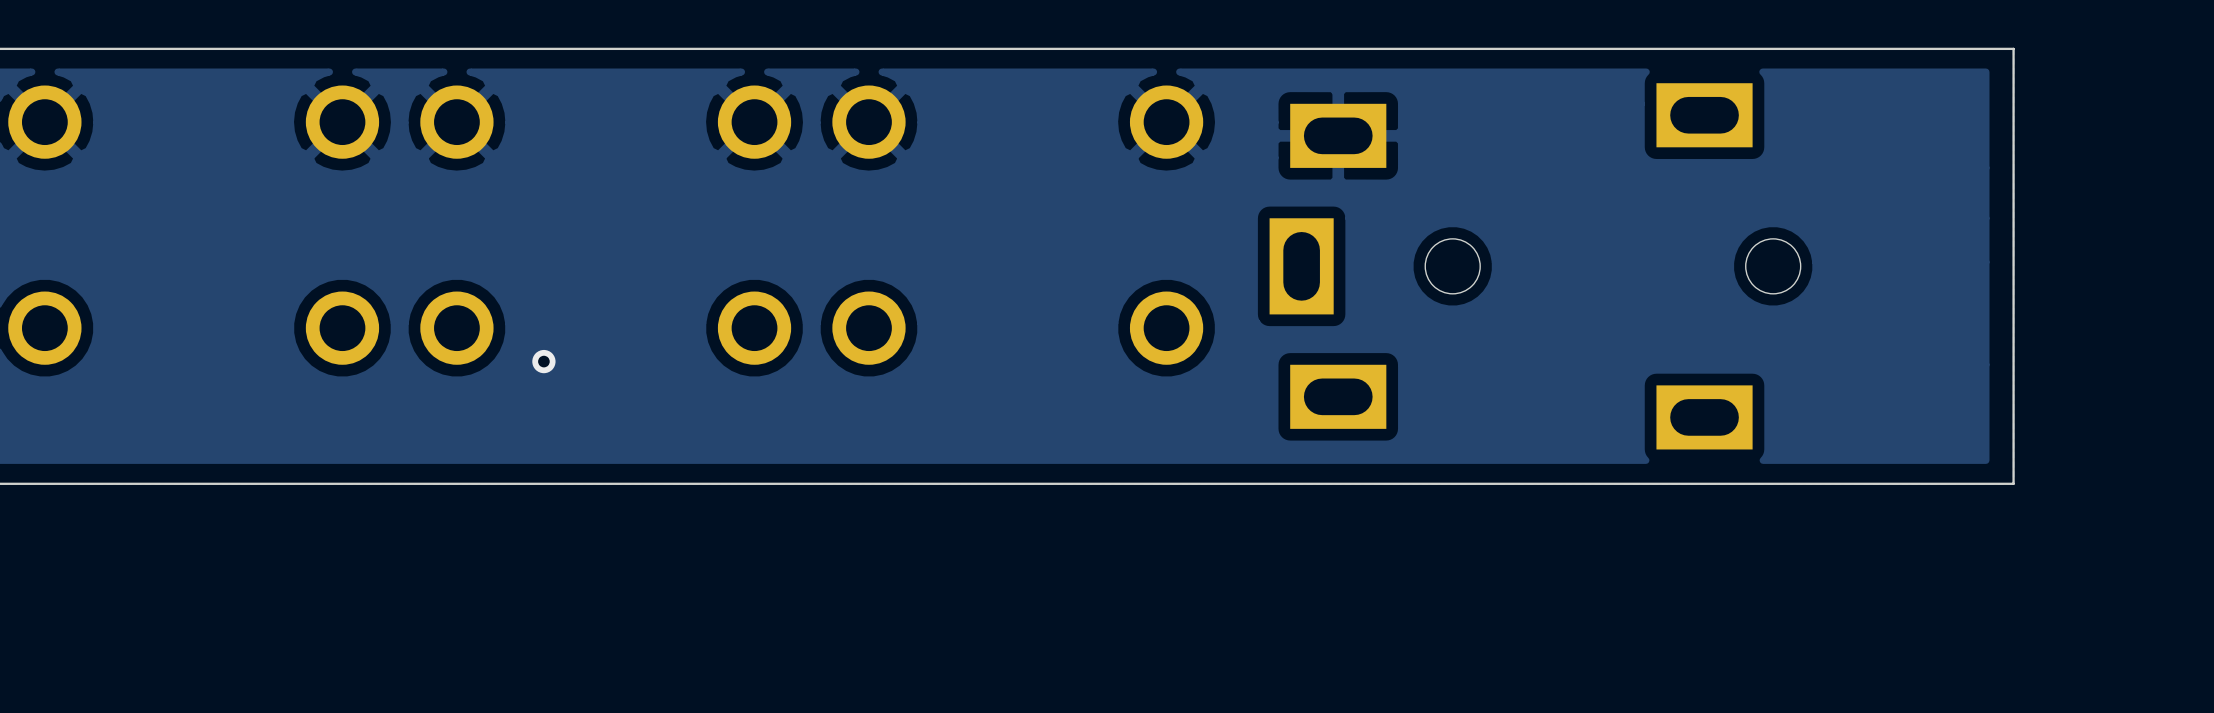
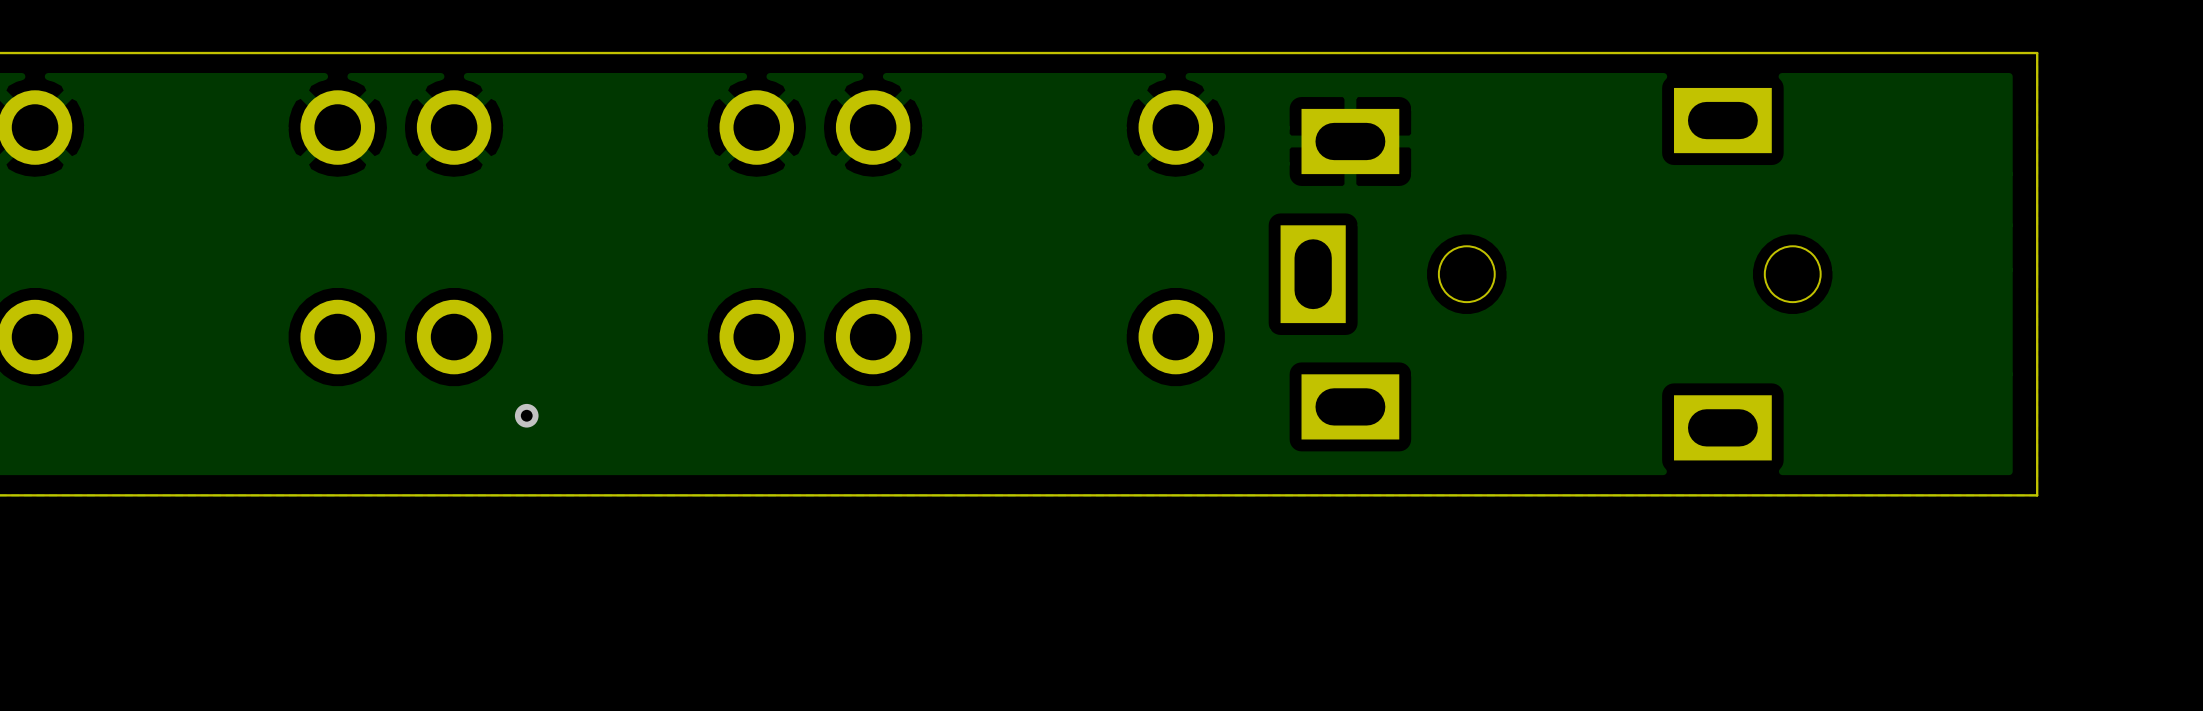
via position: (543, 361) -> (526, 415)

